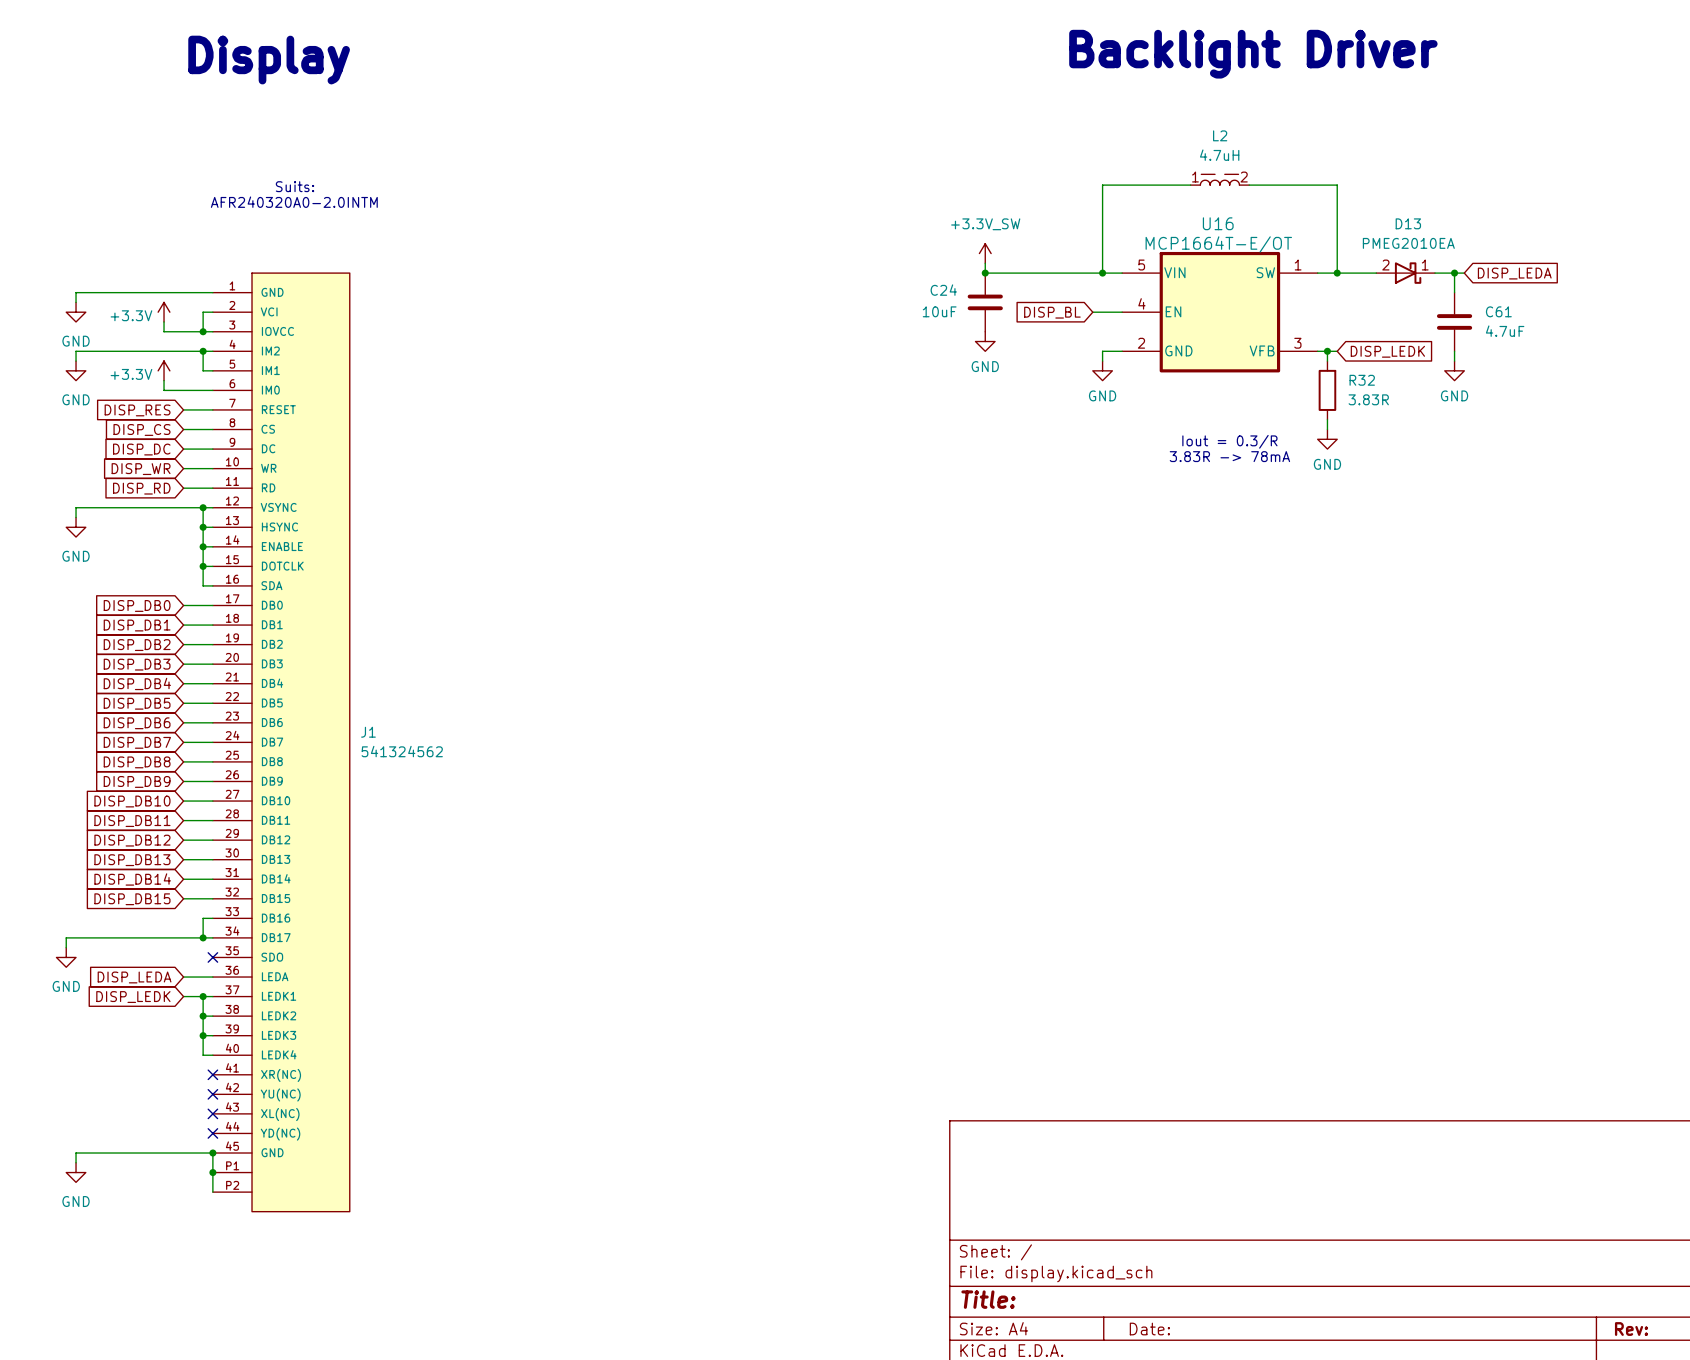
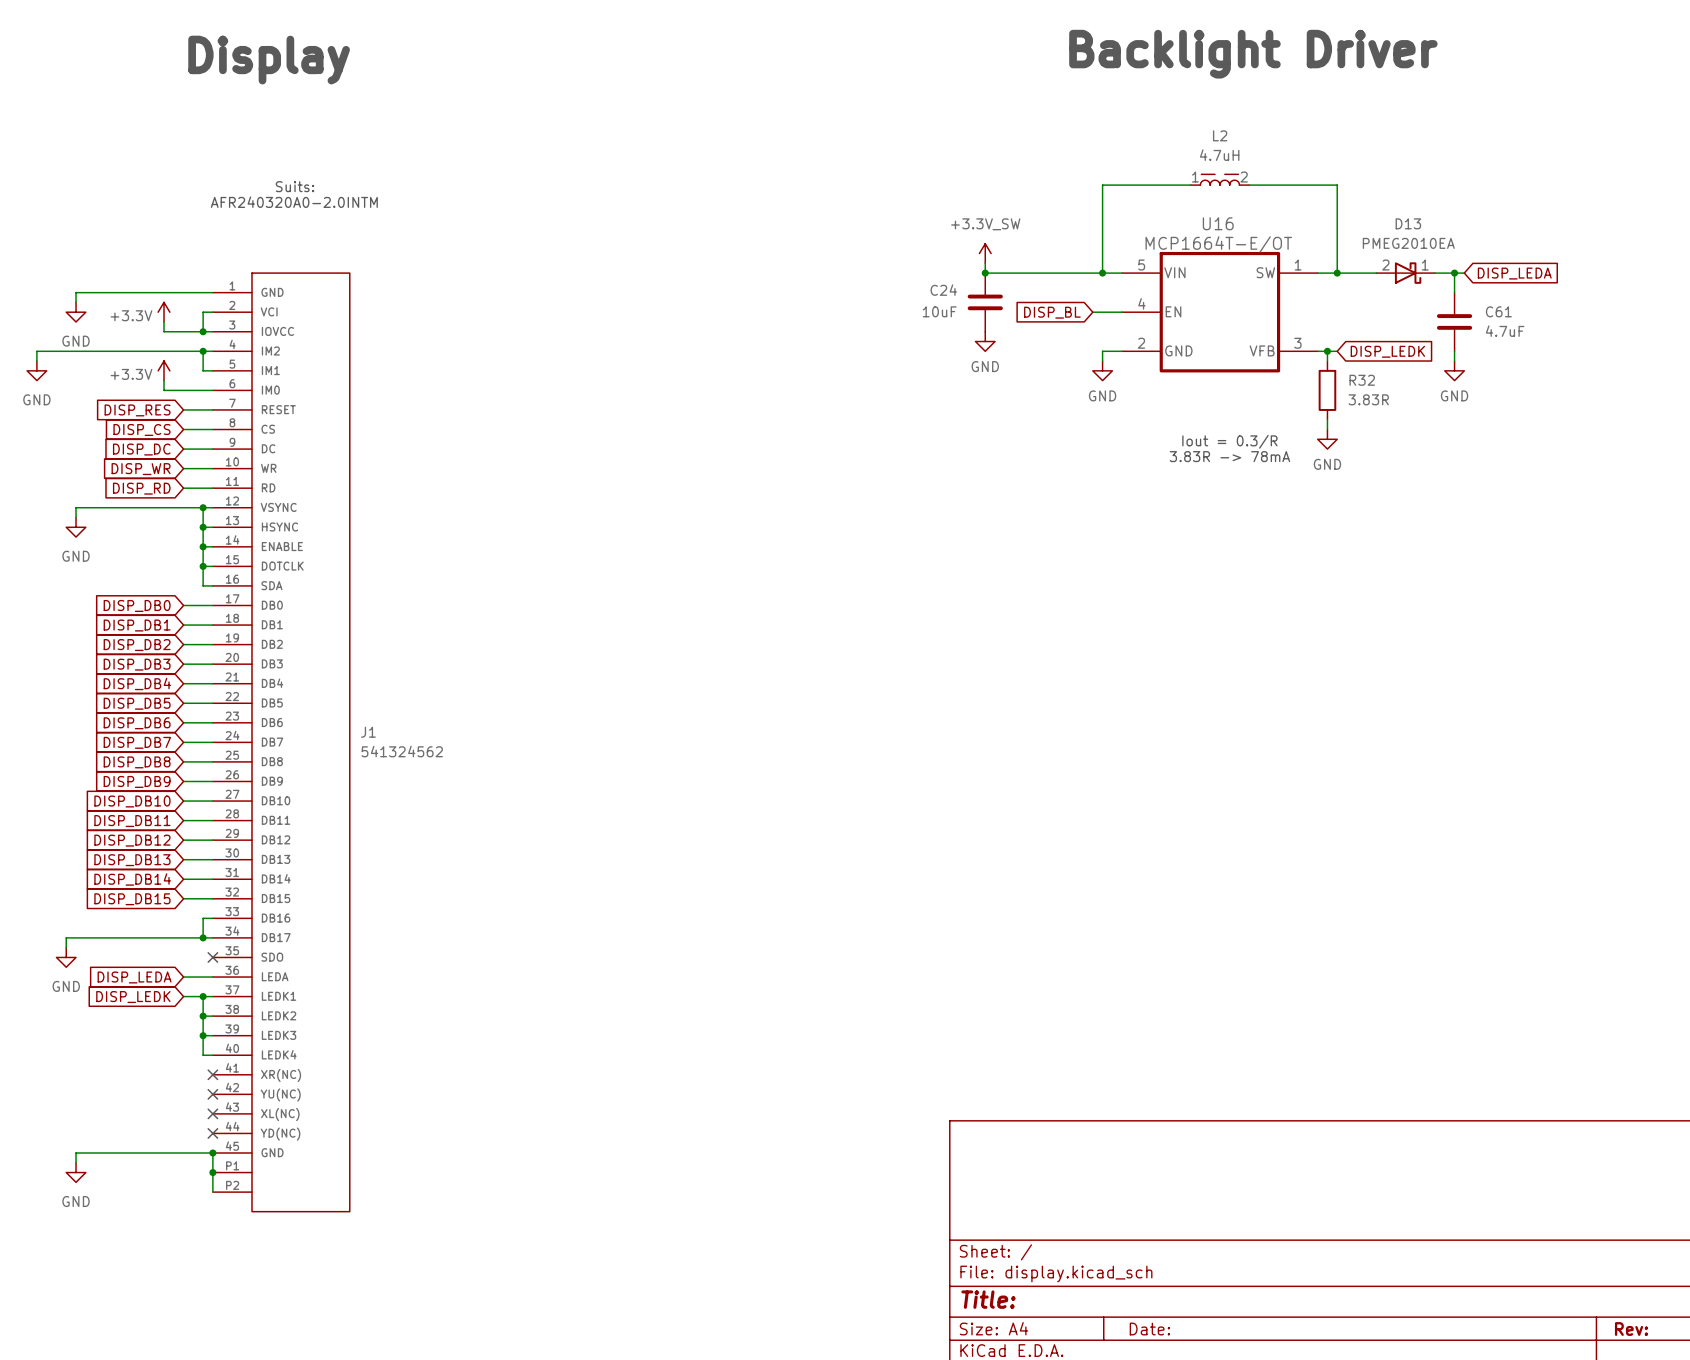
wire: (76, 351) (76, 361) -> (76, 351) (36, 351) (36, 361)
power symbol position: GND (76, 370) -> GND (36, 370)

